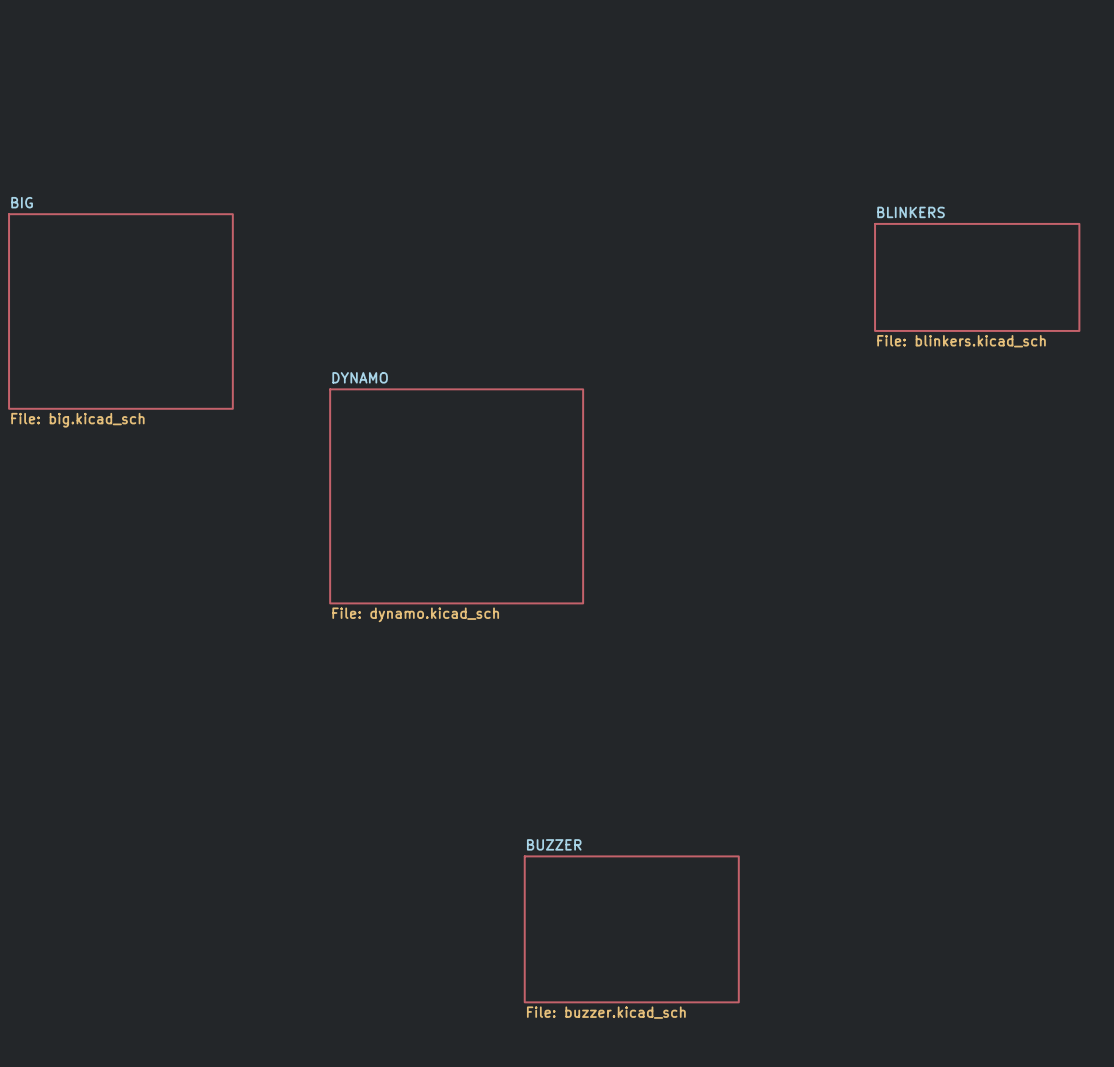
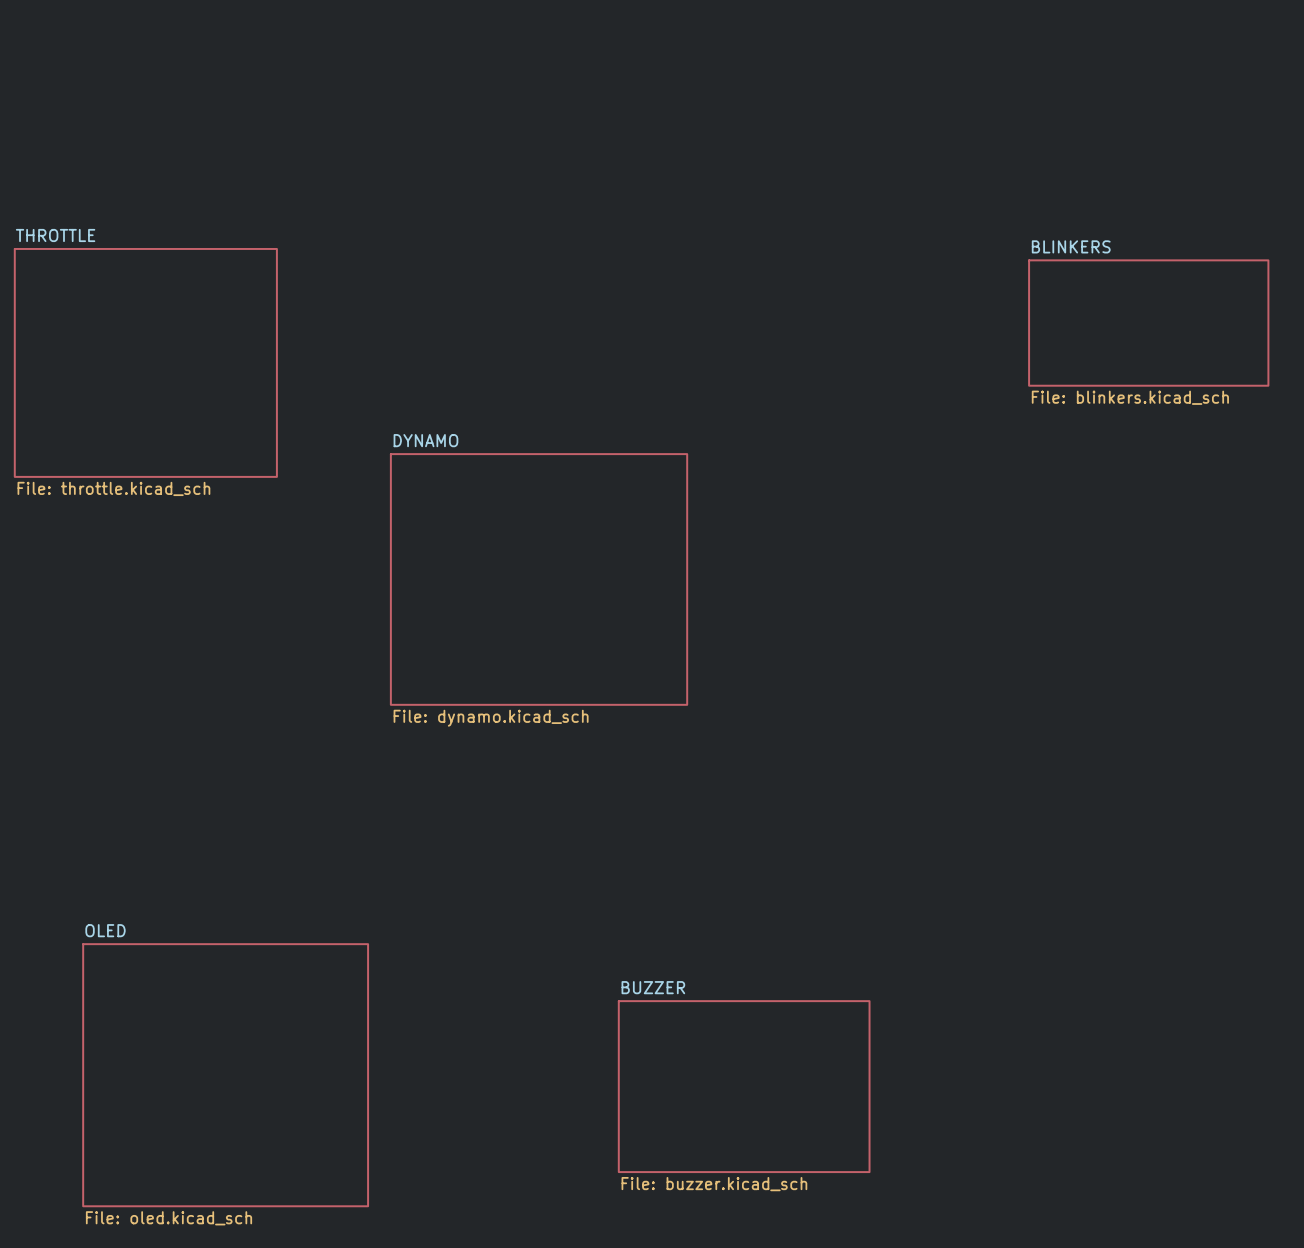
sheet BIG name: BIG (22, 202) -> THROTTLE (55, 235)
sheet BIG value: File: big.kicad_sch (77, 420) -> File: throttle.kicad_sch (113, 488)
sheet OLED: none -> File: oled.kicad_sch (225, 1075)

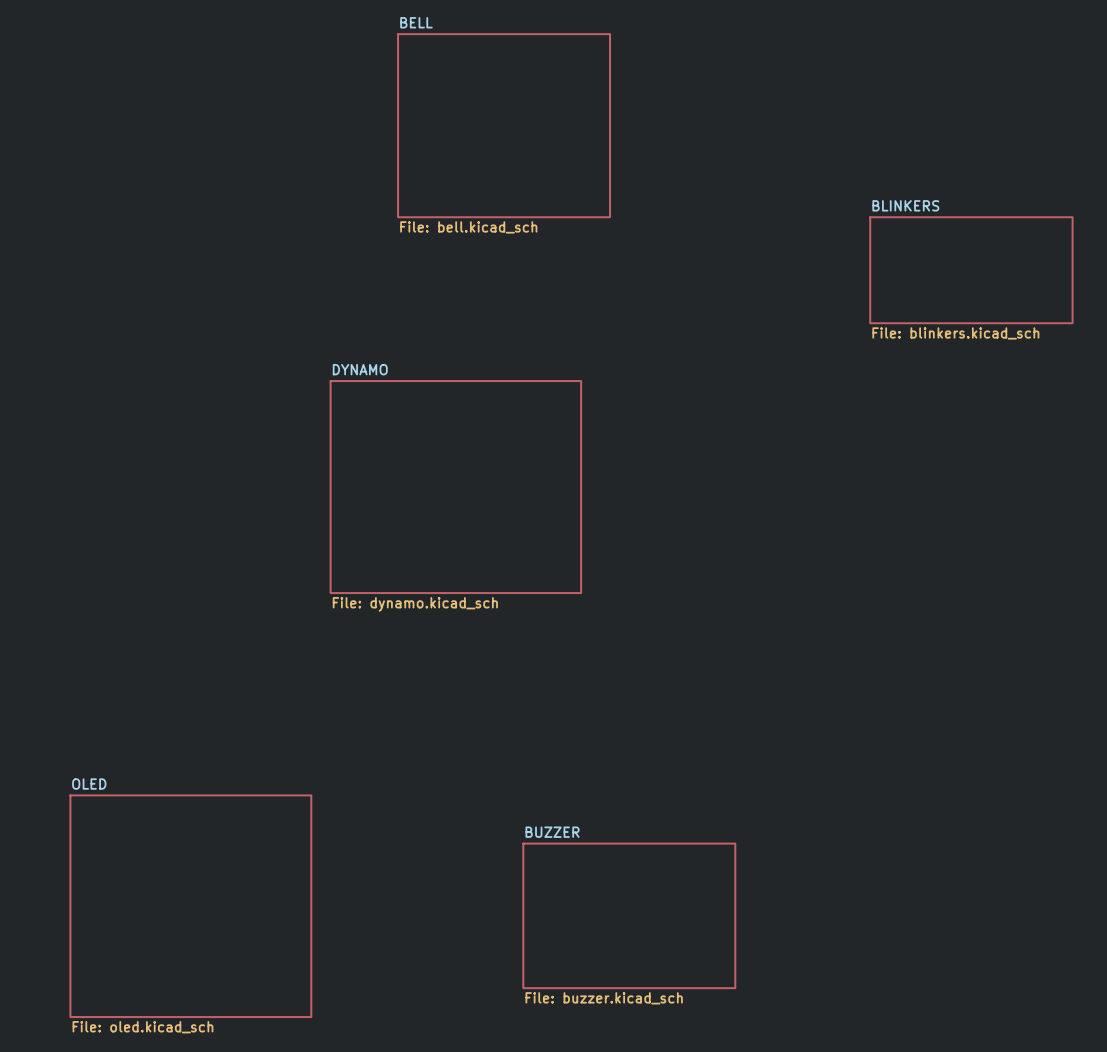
sheet BELL: none -> File: bell.kicad_sch (504, 125)
sheet THROTTLE: File: throttle.kicad_sch (145, 362) -> none

